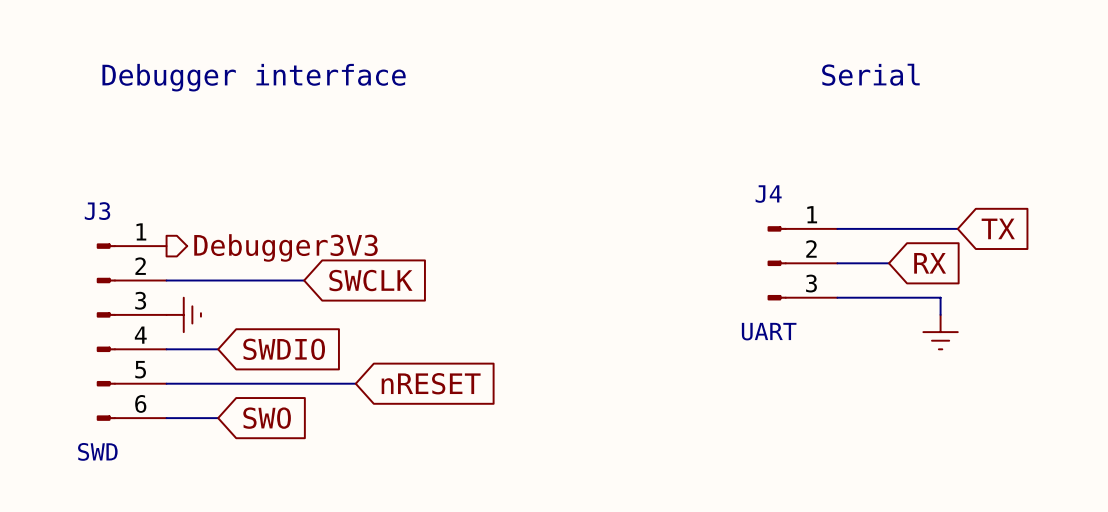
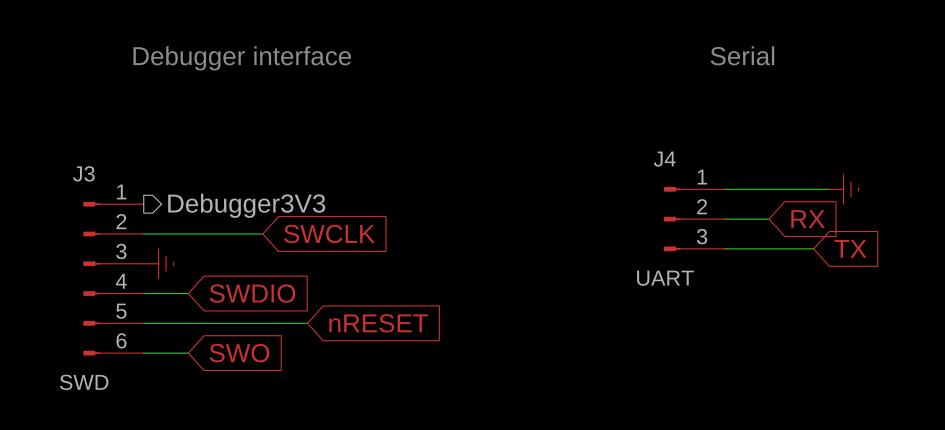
global label position: TX (998, 228) -> TX (850, 248)
wire: (940, 297) (940, 314) -> none
power symbol rotation: 0° (940, 332) -> 90° counterclockwise (843, 189)
power symbol position: (940, 332) -> (843, 189)

